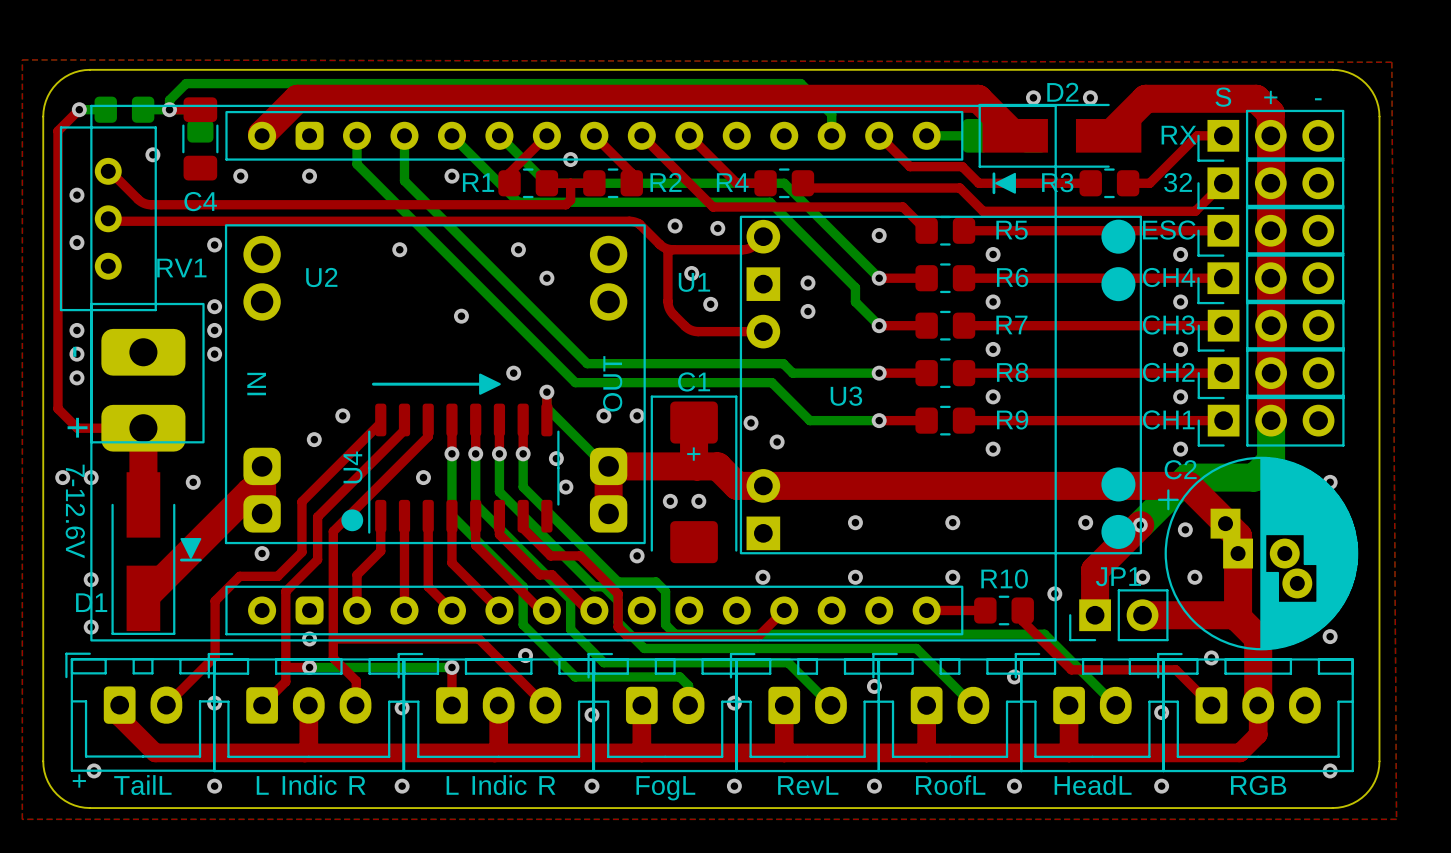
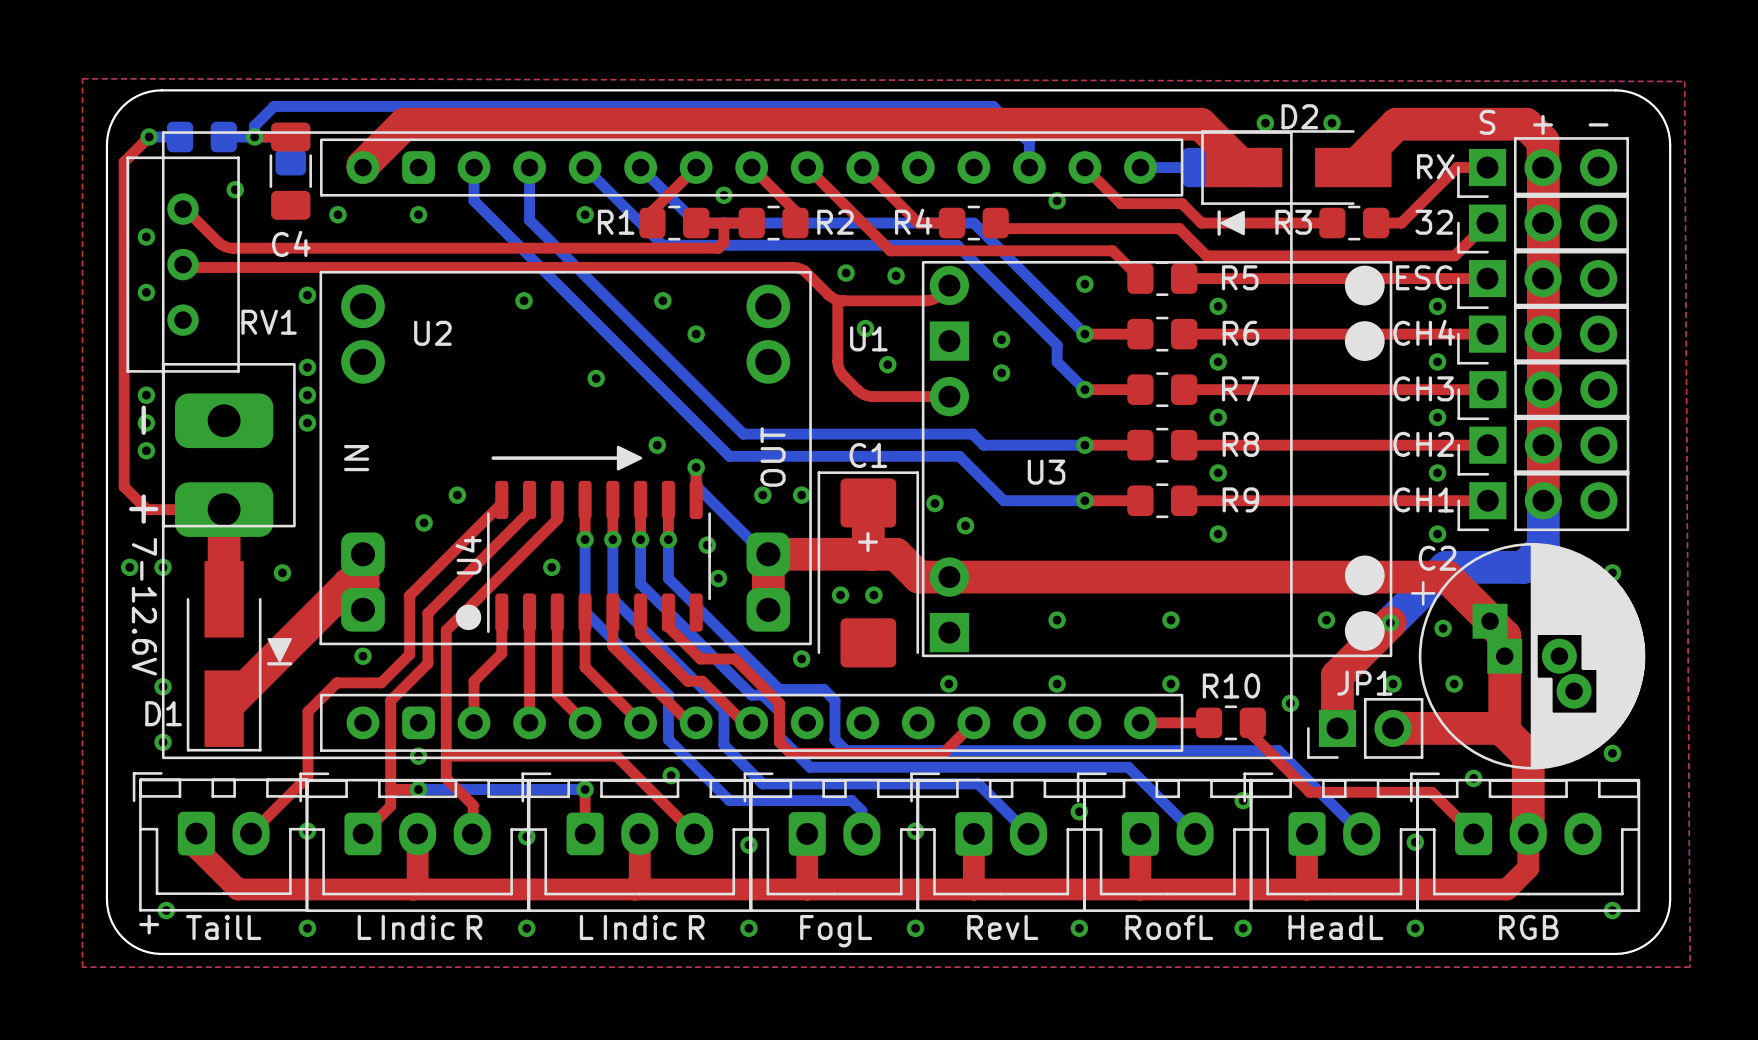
via: none -> (1057, 200)

